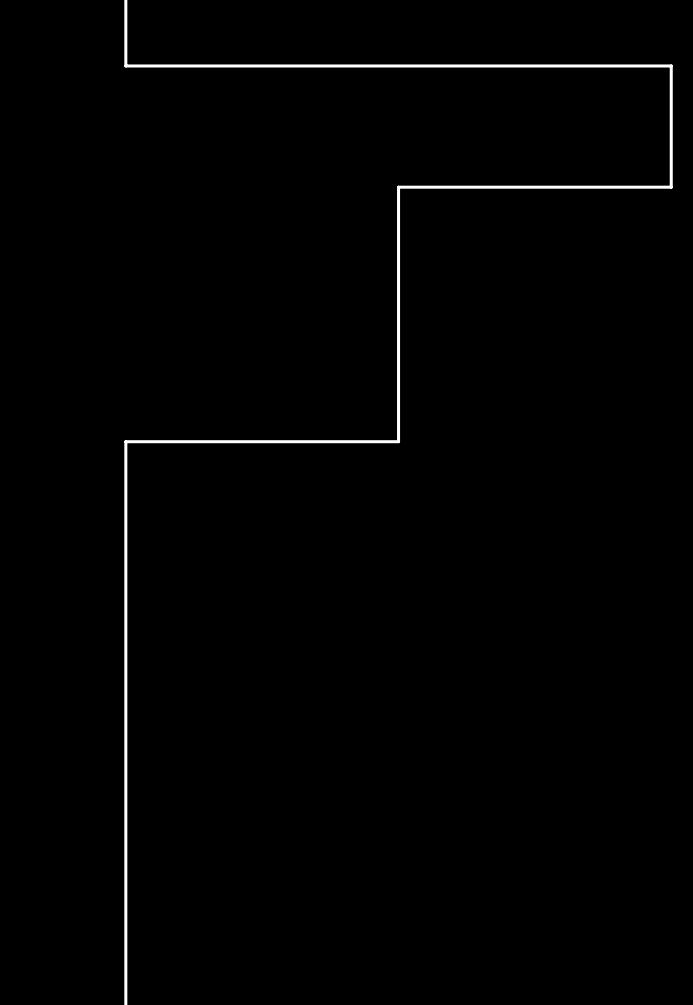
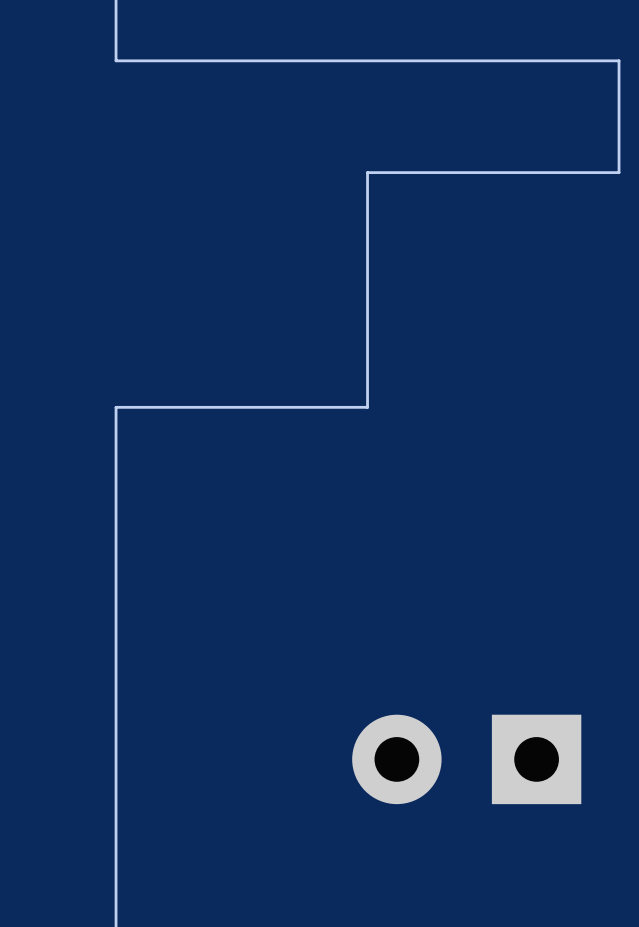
part: none -> (466, 759)

